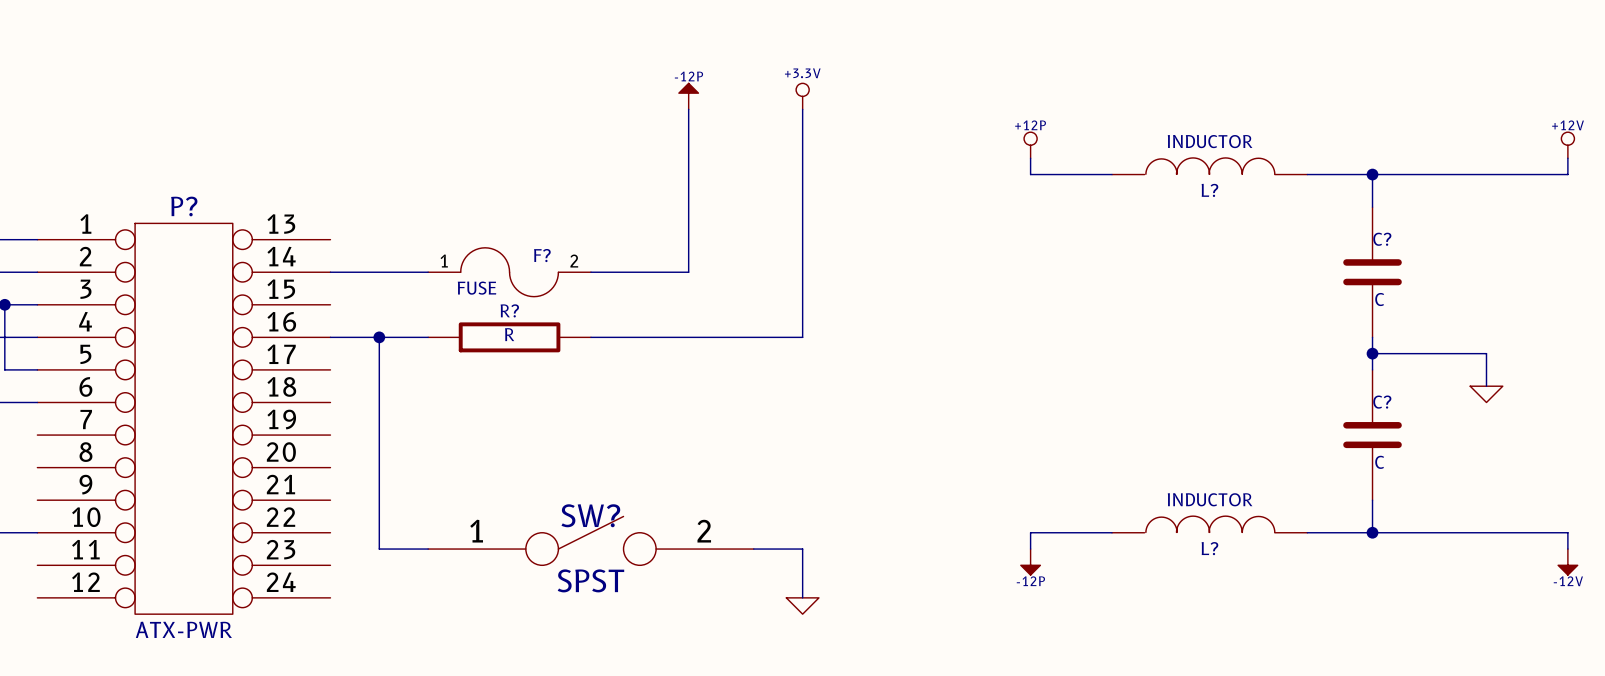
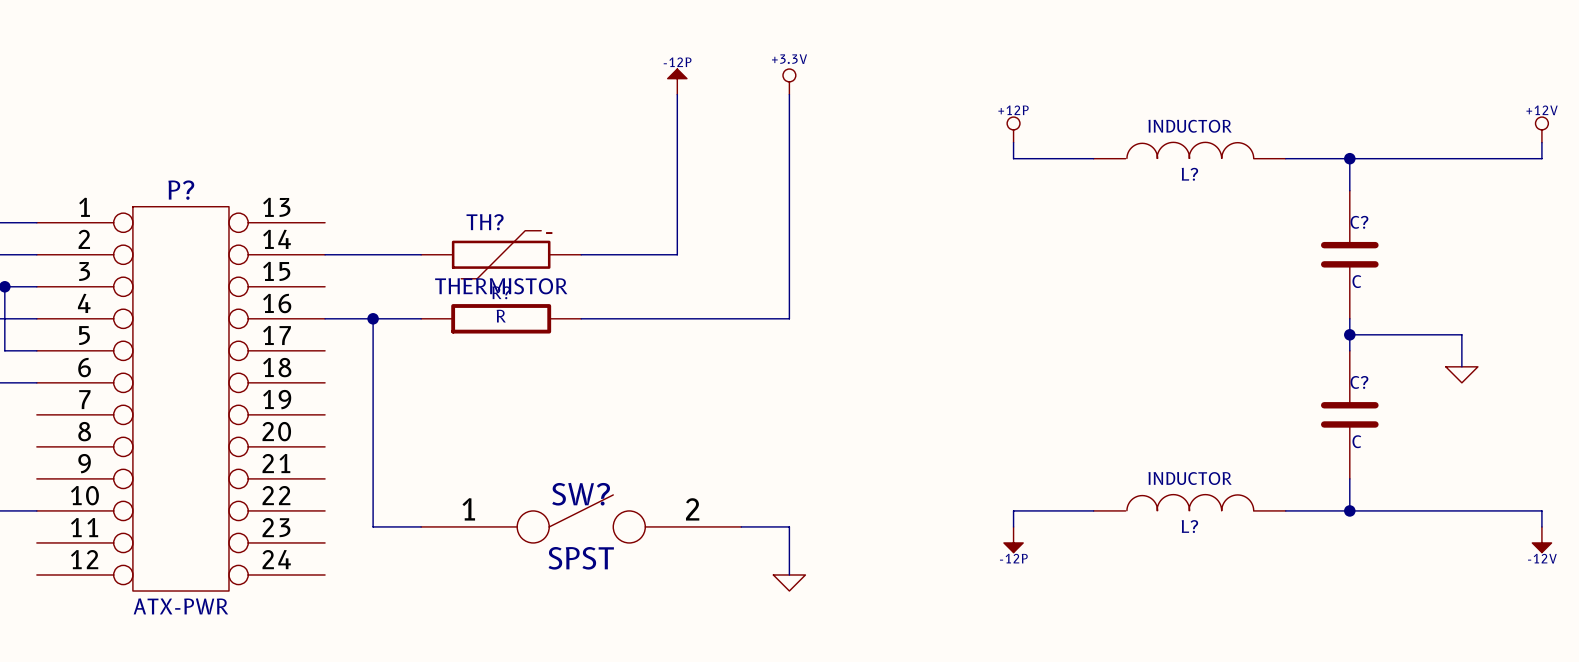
F?: FUSE (509, 272) -> none
TH?: none -> THERMISTOR (501, 254)

